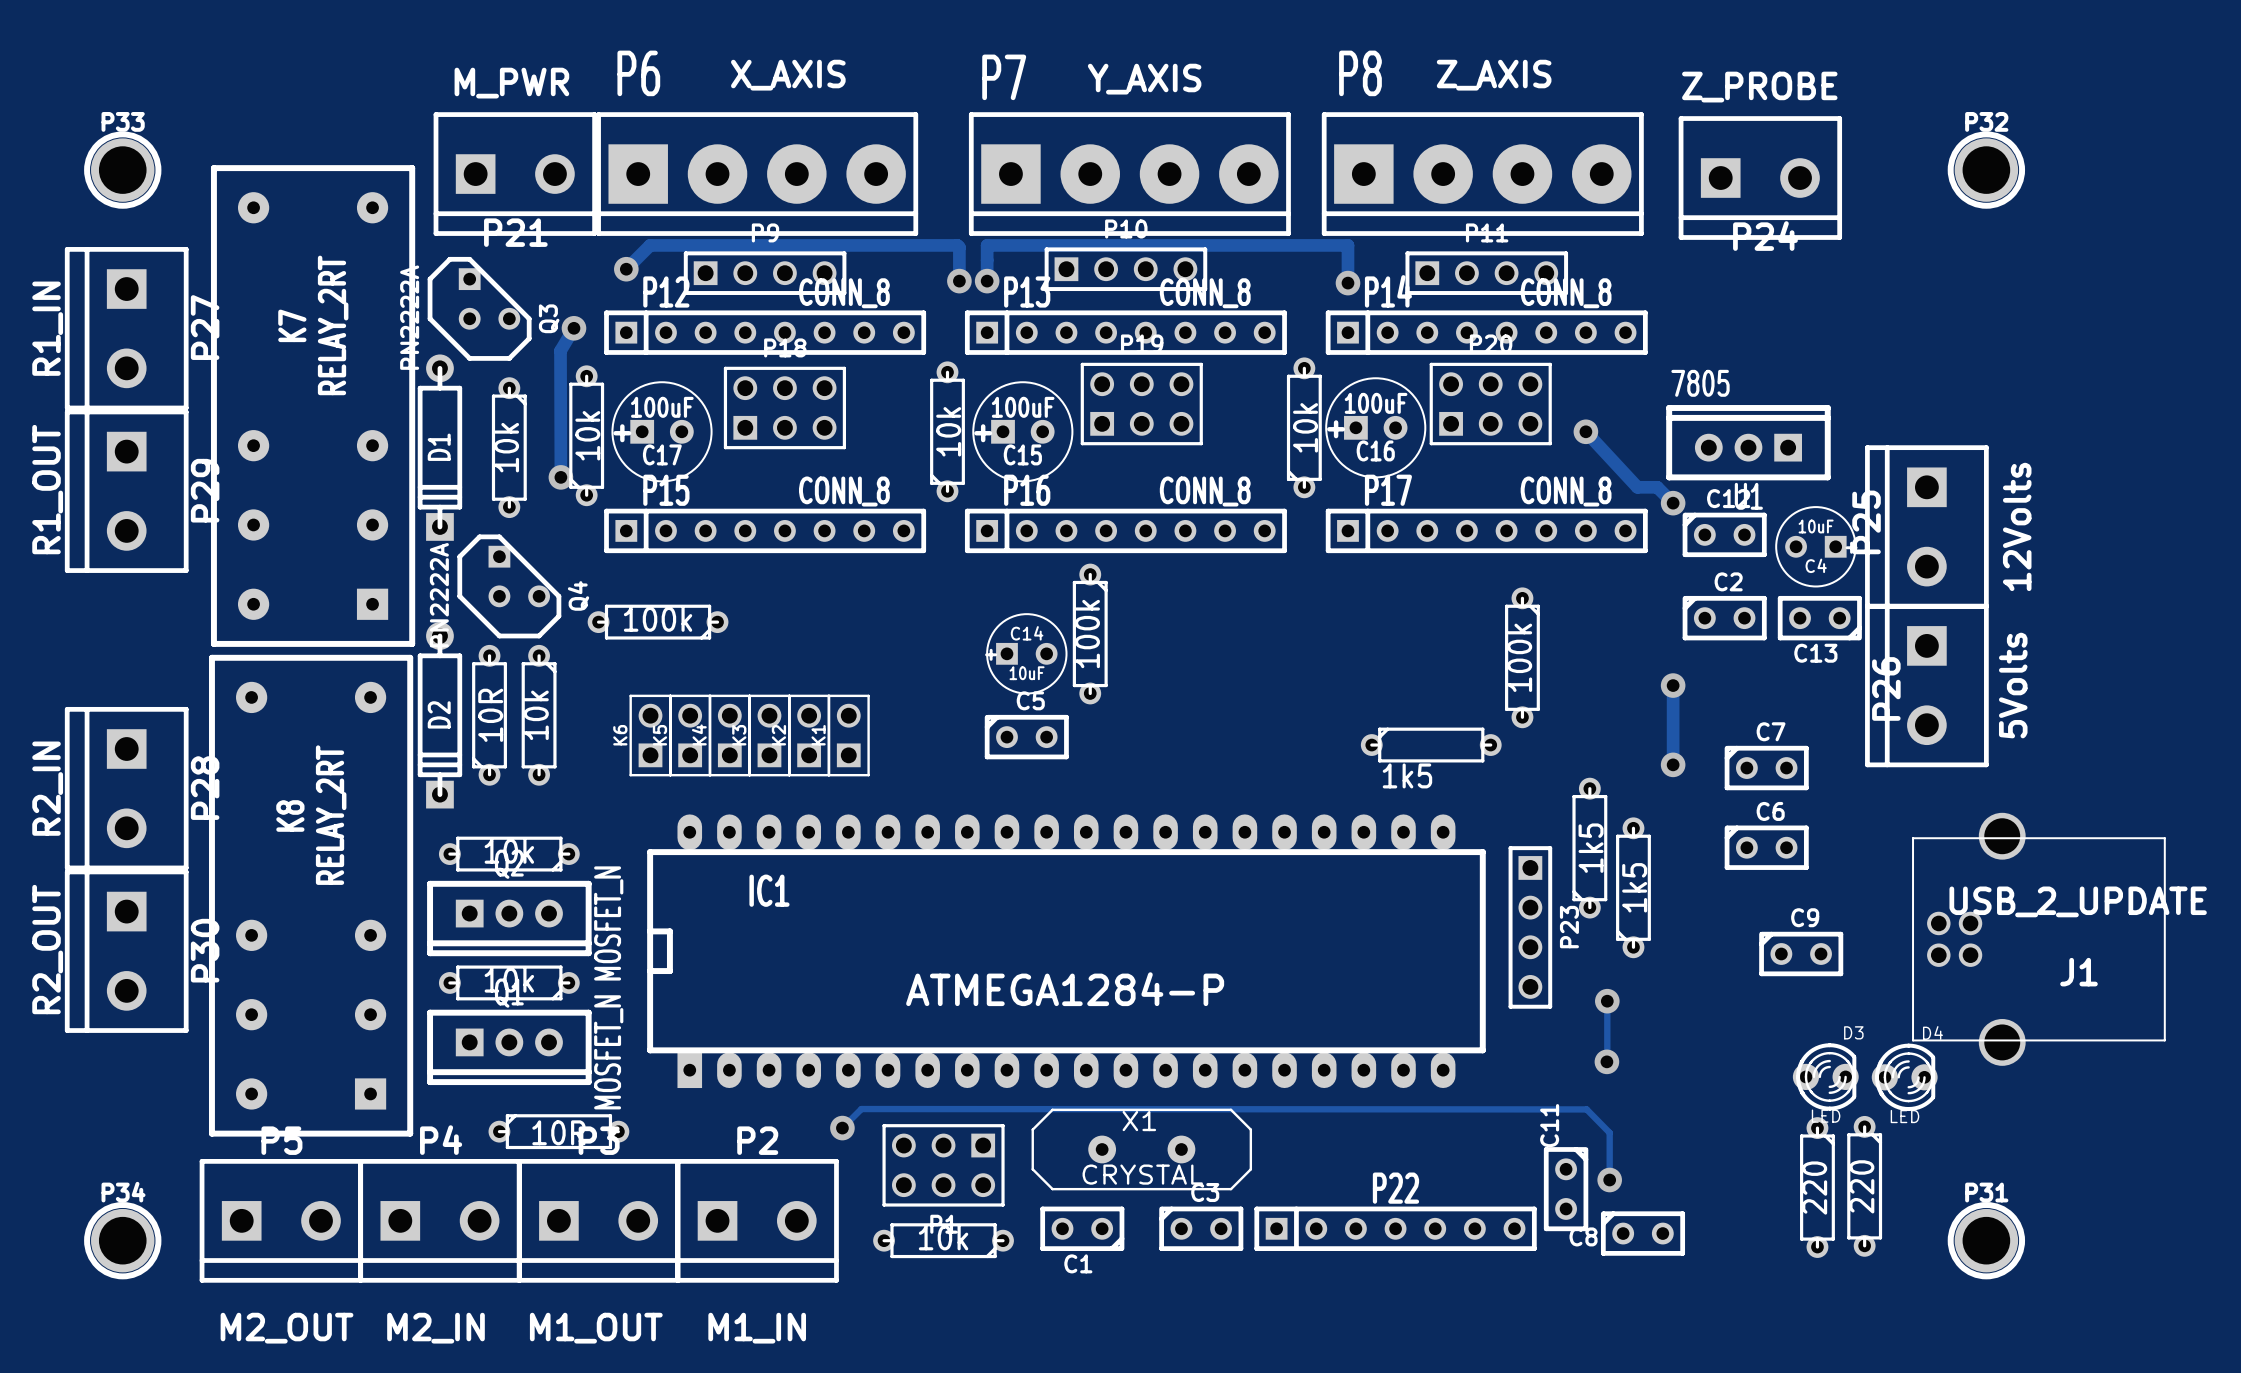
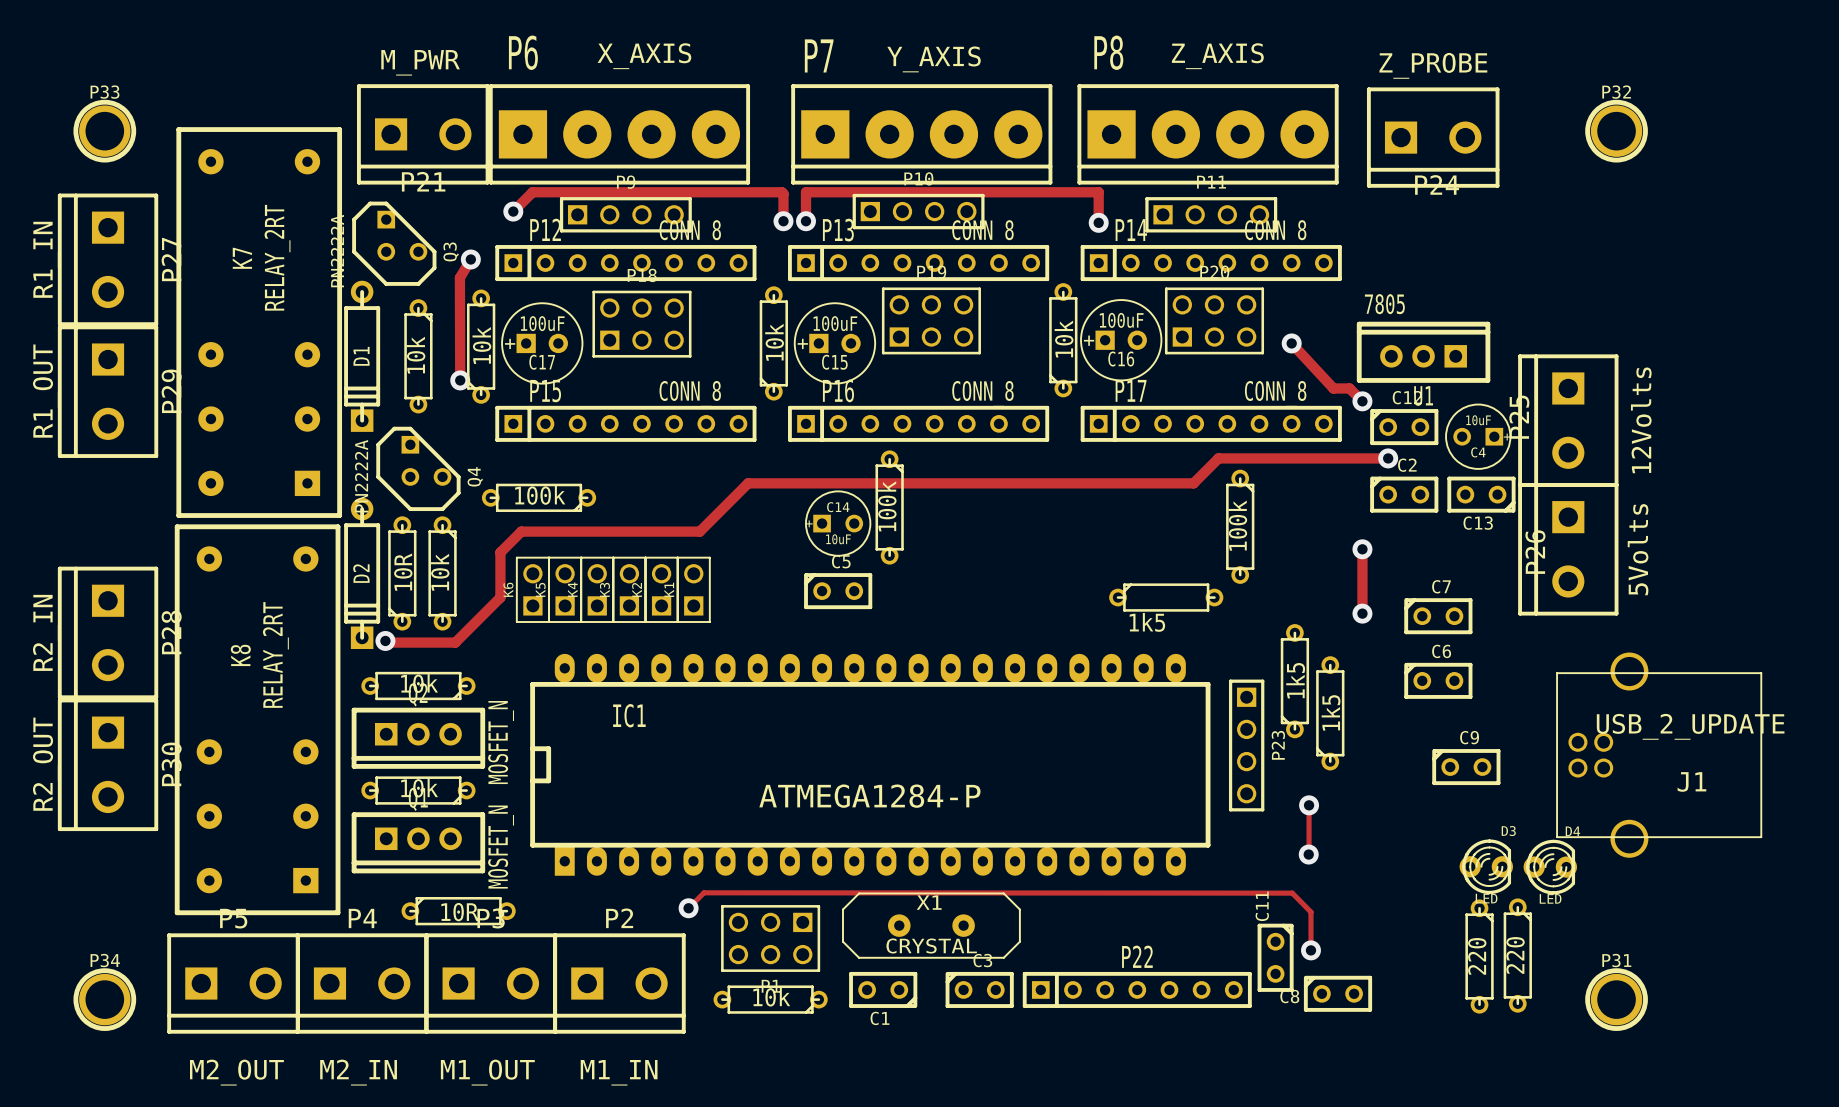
track: none -> (1388, 458) (1218, 458) (1193, 483) (748, 483) (699, 531) (521, 531) (500, 552) (500, 597) (455, 642) (387, 642) (385, 640)
via: none -> (1388, 458)
via: none -> (385, 640)

